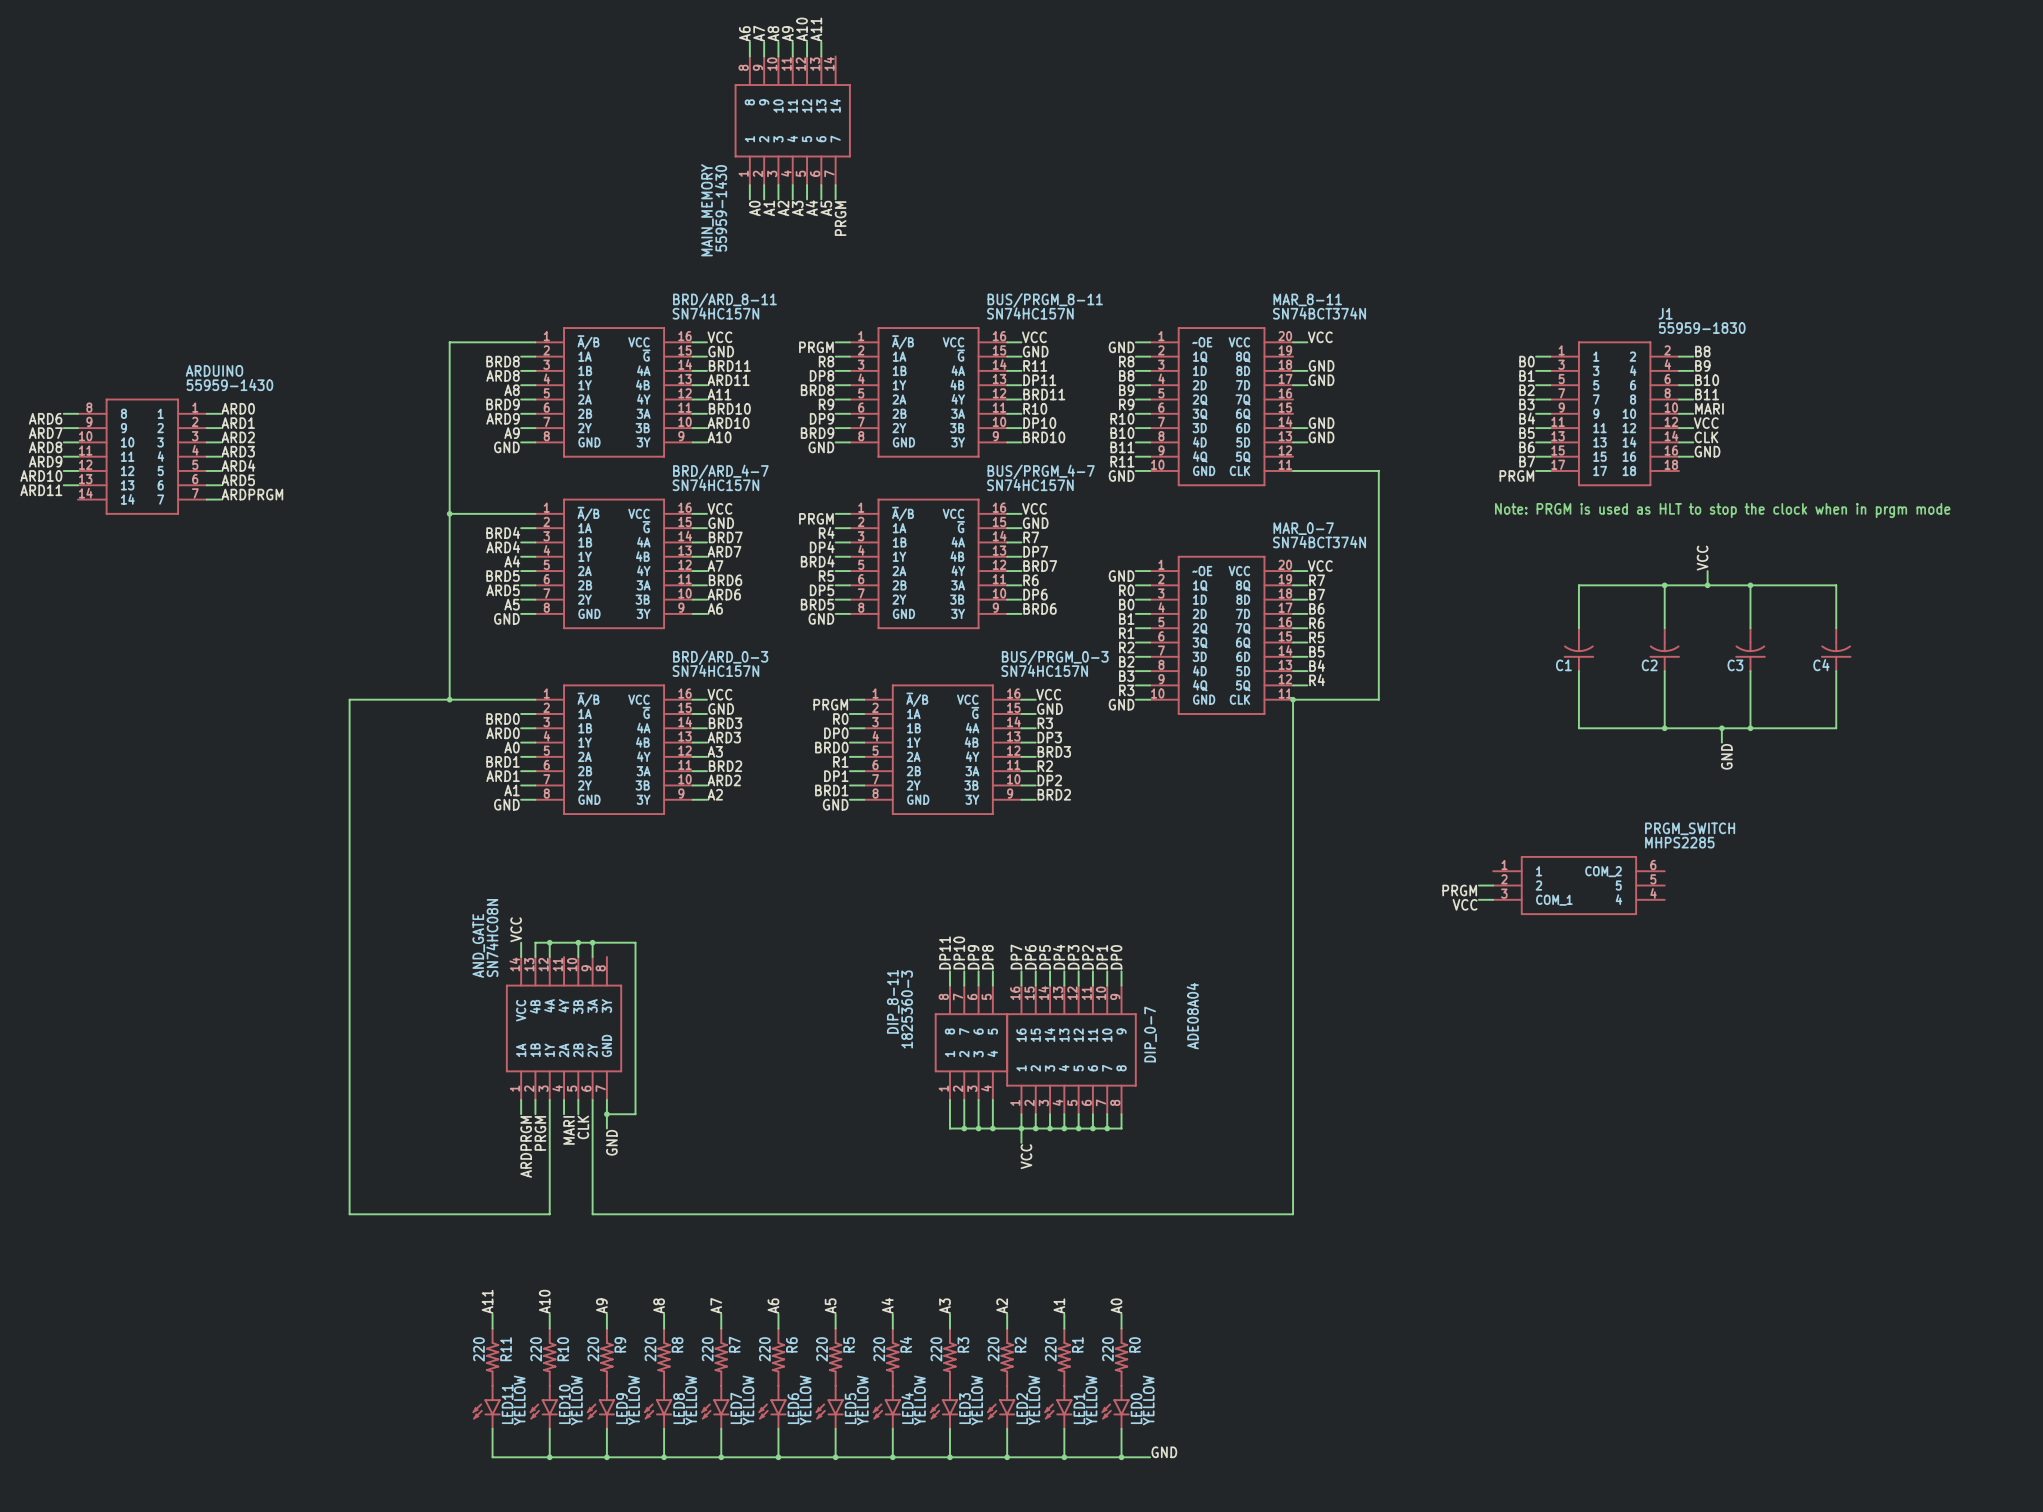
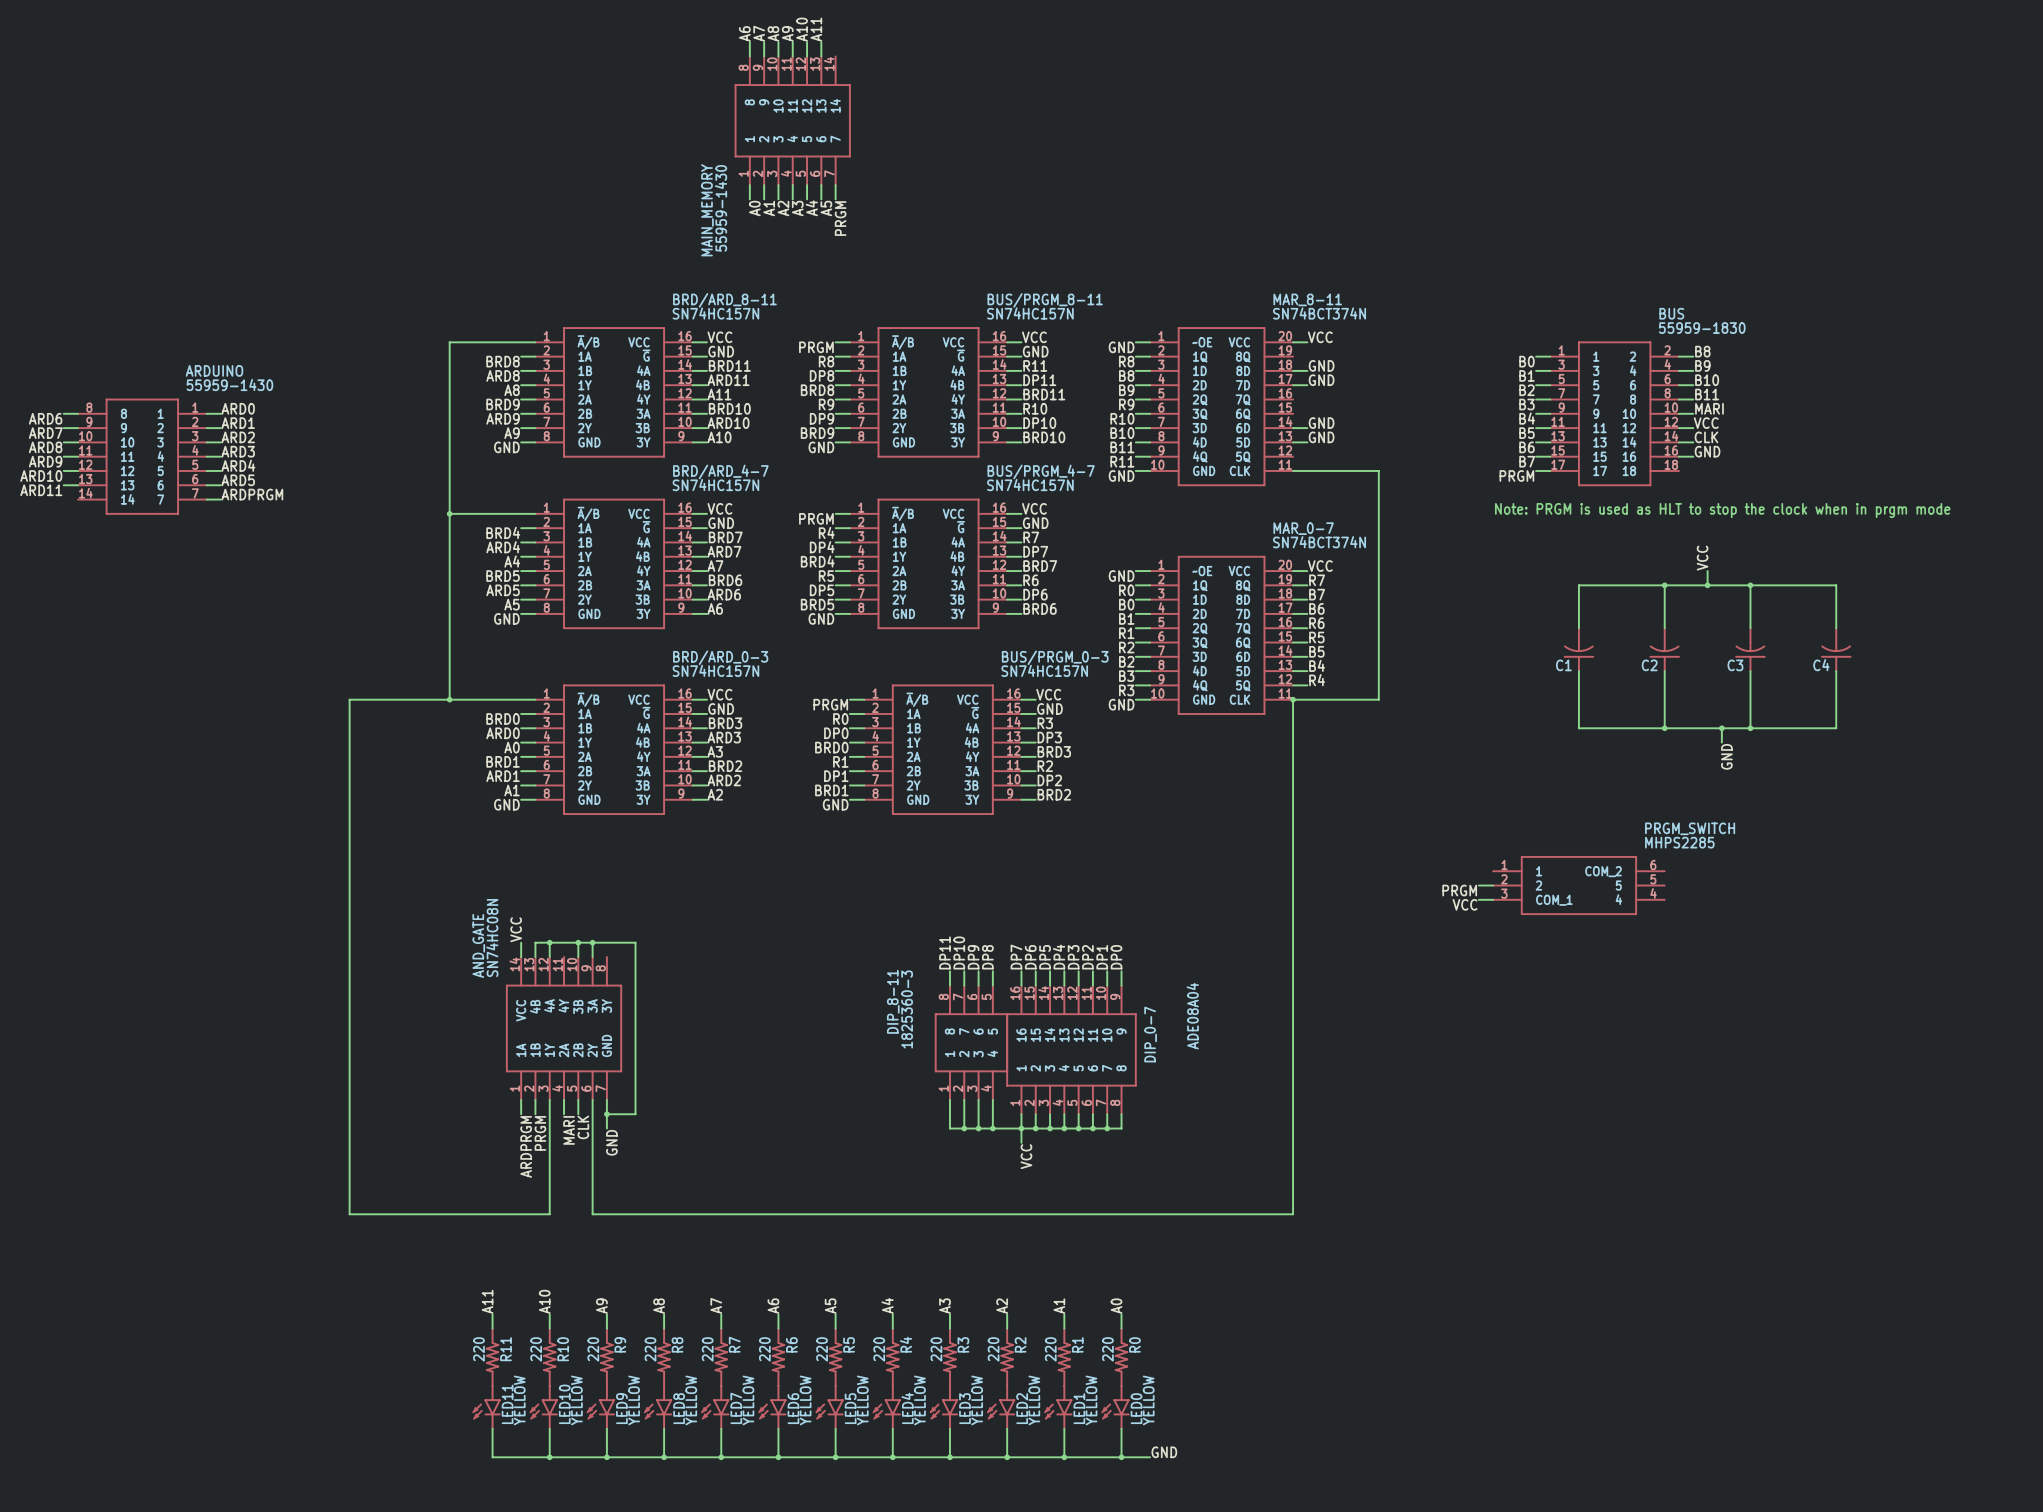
J1 name: J1 (1665, 313) -> BUS (1671, 313)

